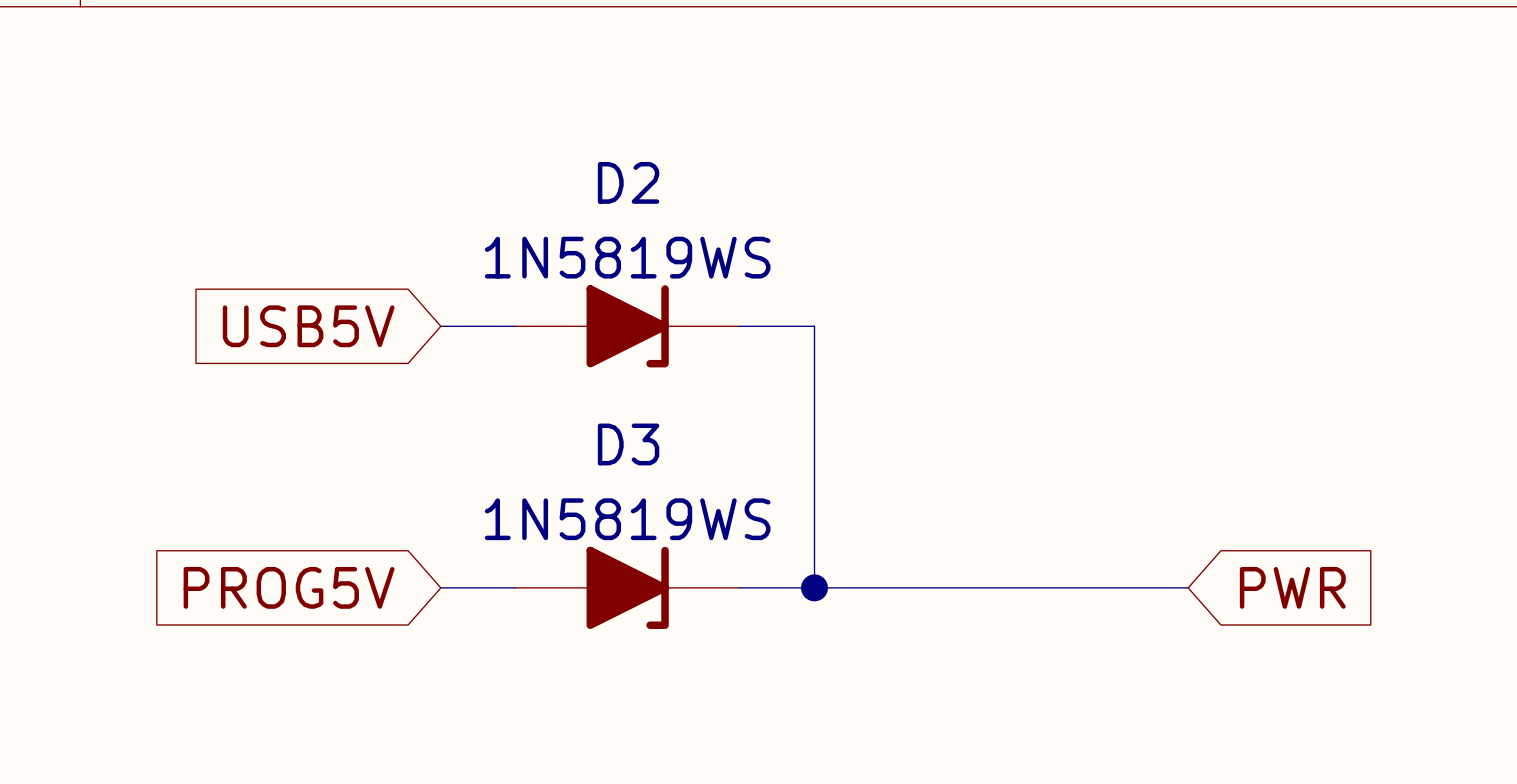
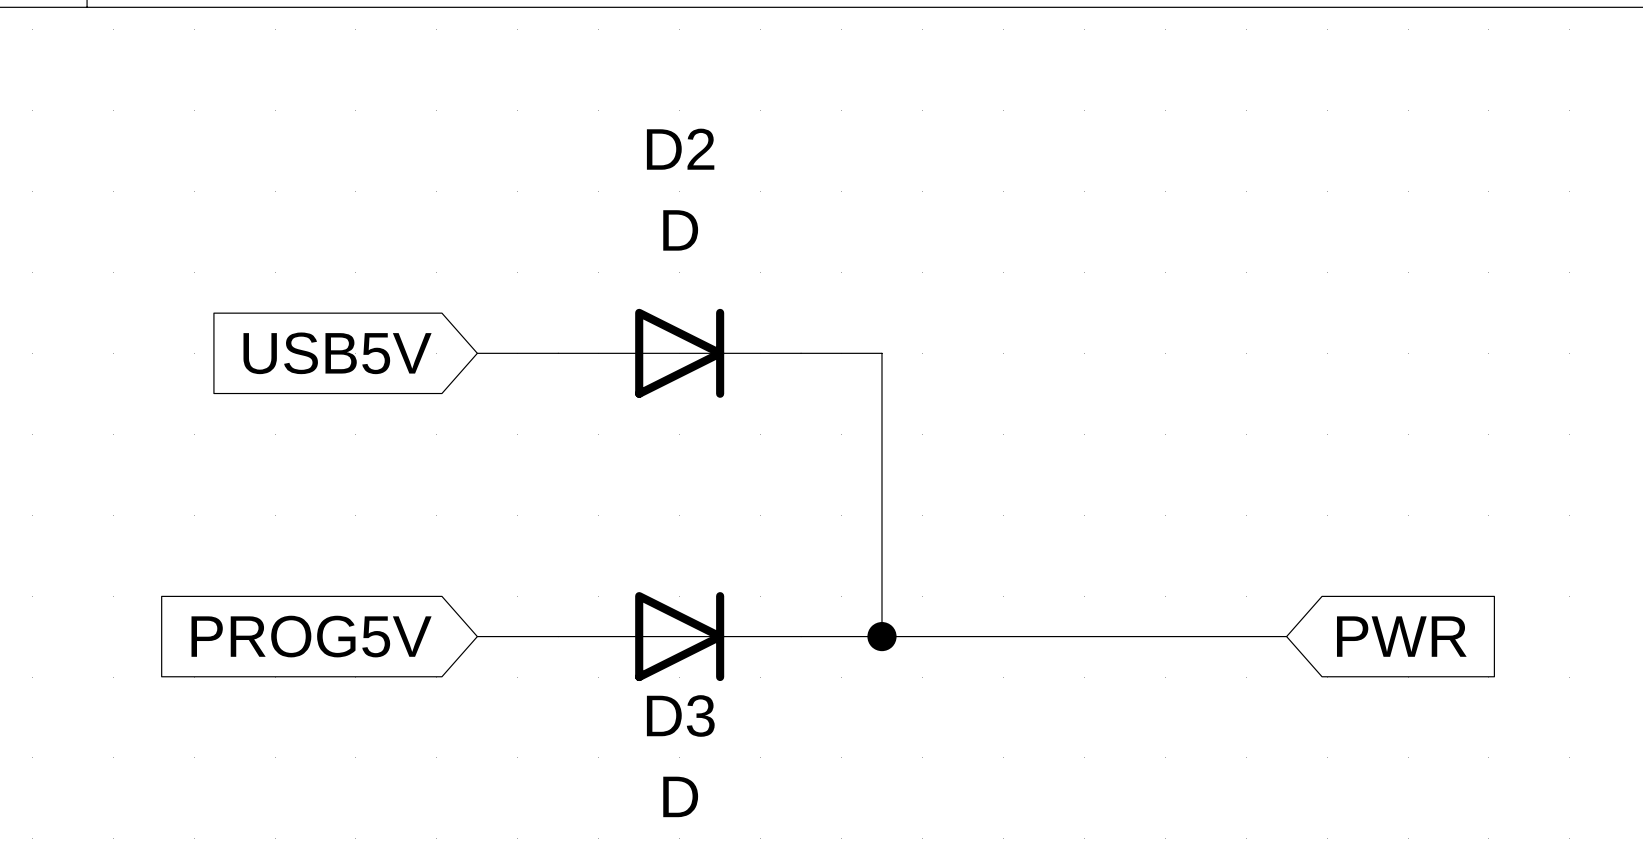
D2 name position: D2 (628, 182) -> D2 (680, 149)
D2 value: 1N5819WS (627, 257) -> D (680, 230)
D2 symbol: [515, 285, 740, 368] -> [558, 308, 802, 398]
D3 name position: D3 (628, 444) -> D3 (680, 715)
D3 value: 1N5819WS (627, 519) -> D (680, 796)
D3 symbol: [515, 546, 740, 629] -> [558, 592, 802, 682]

